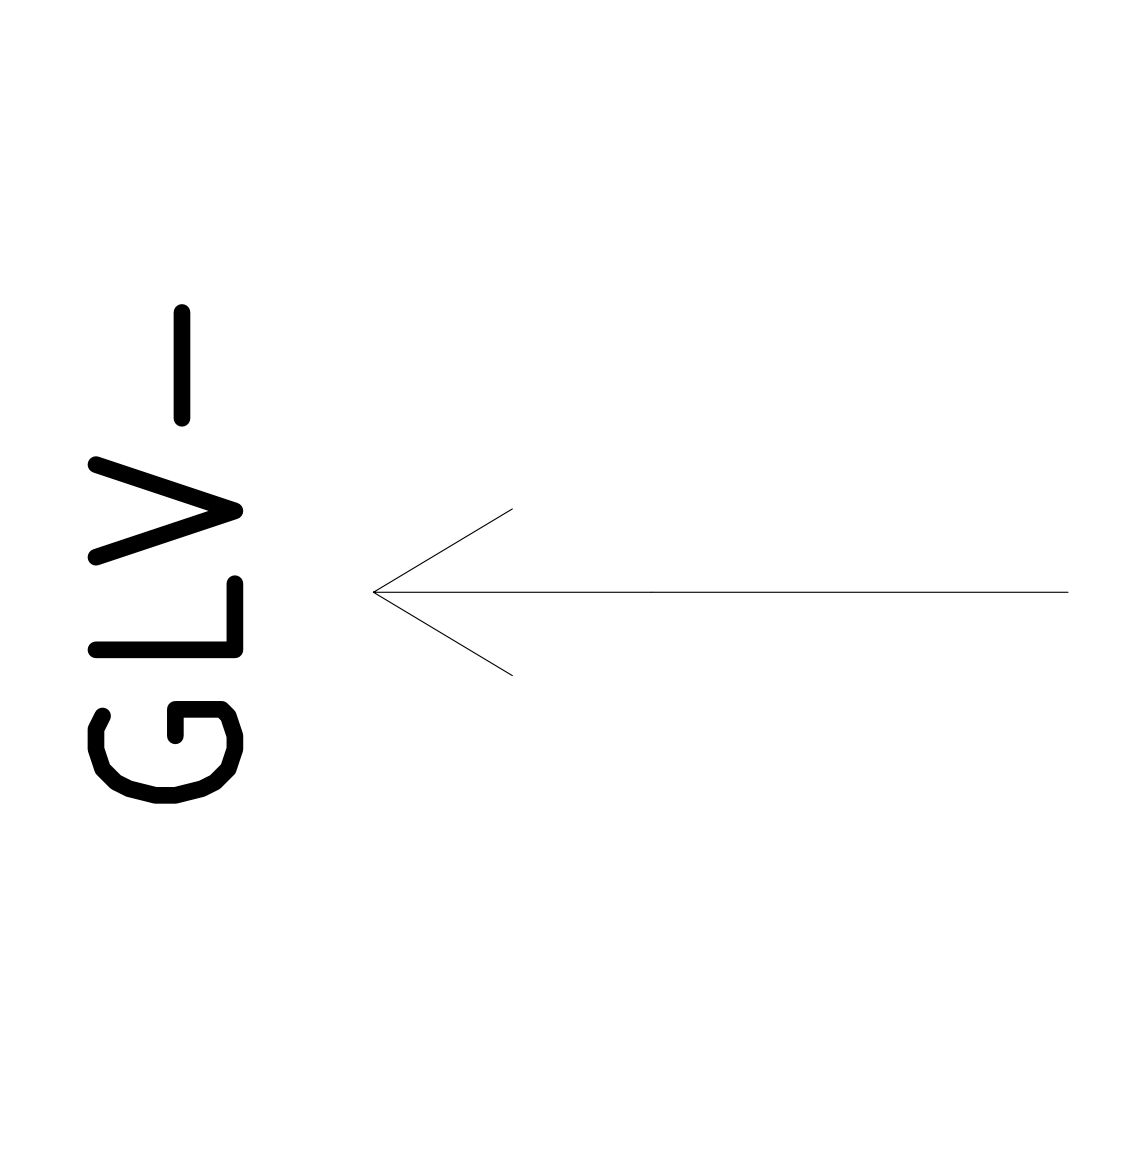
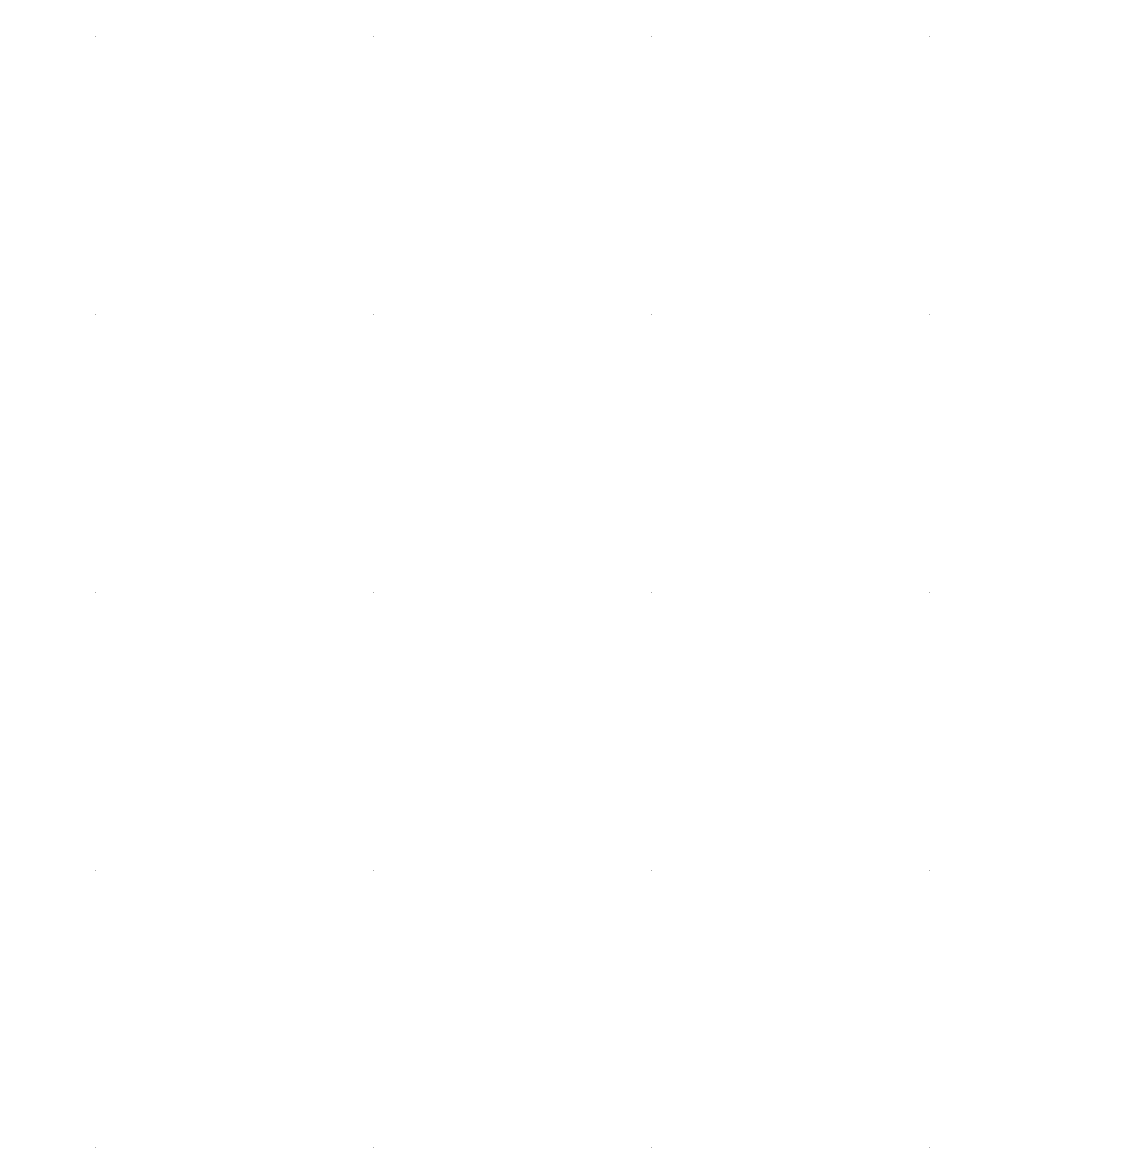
power symbol: GLV- (512, 592) -> none
wire: (651, 592) (1068, 592) -> none

